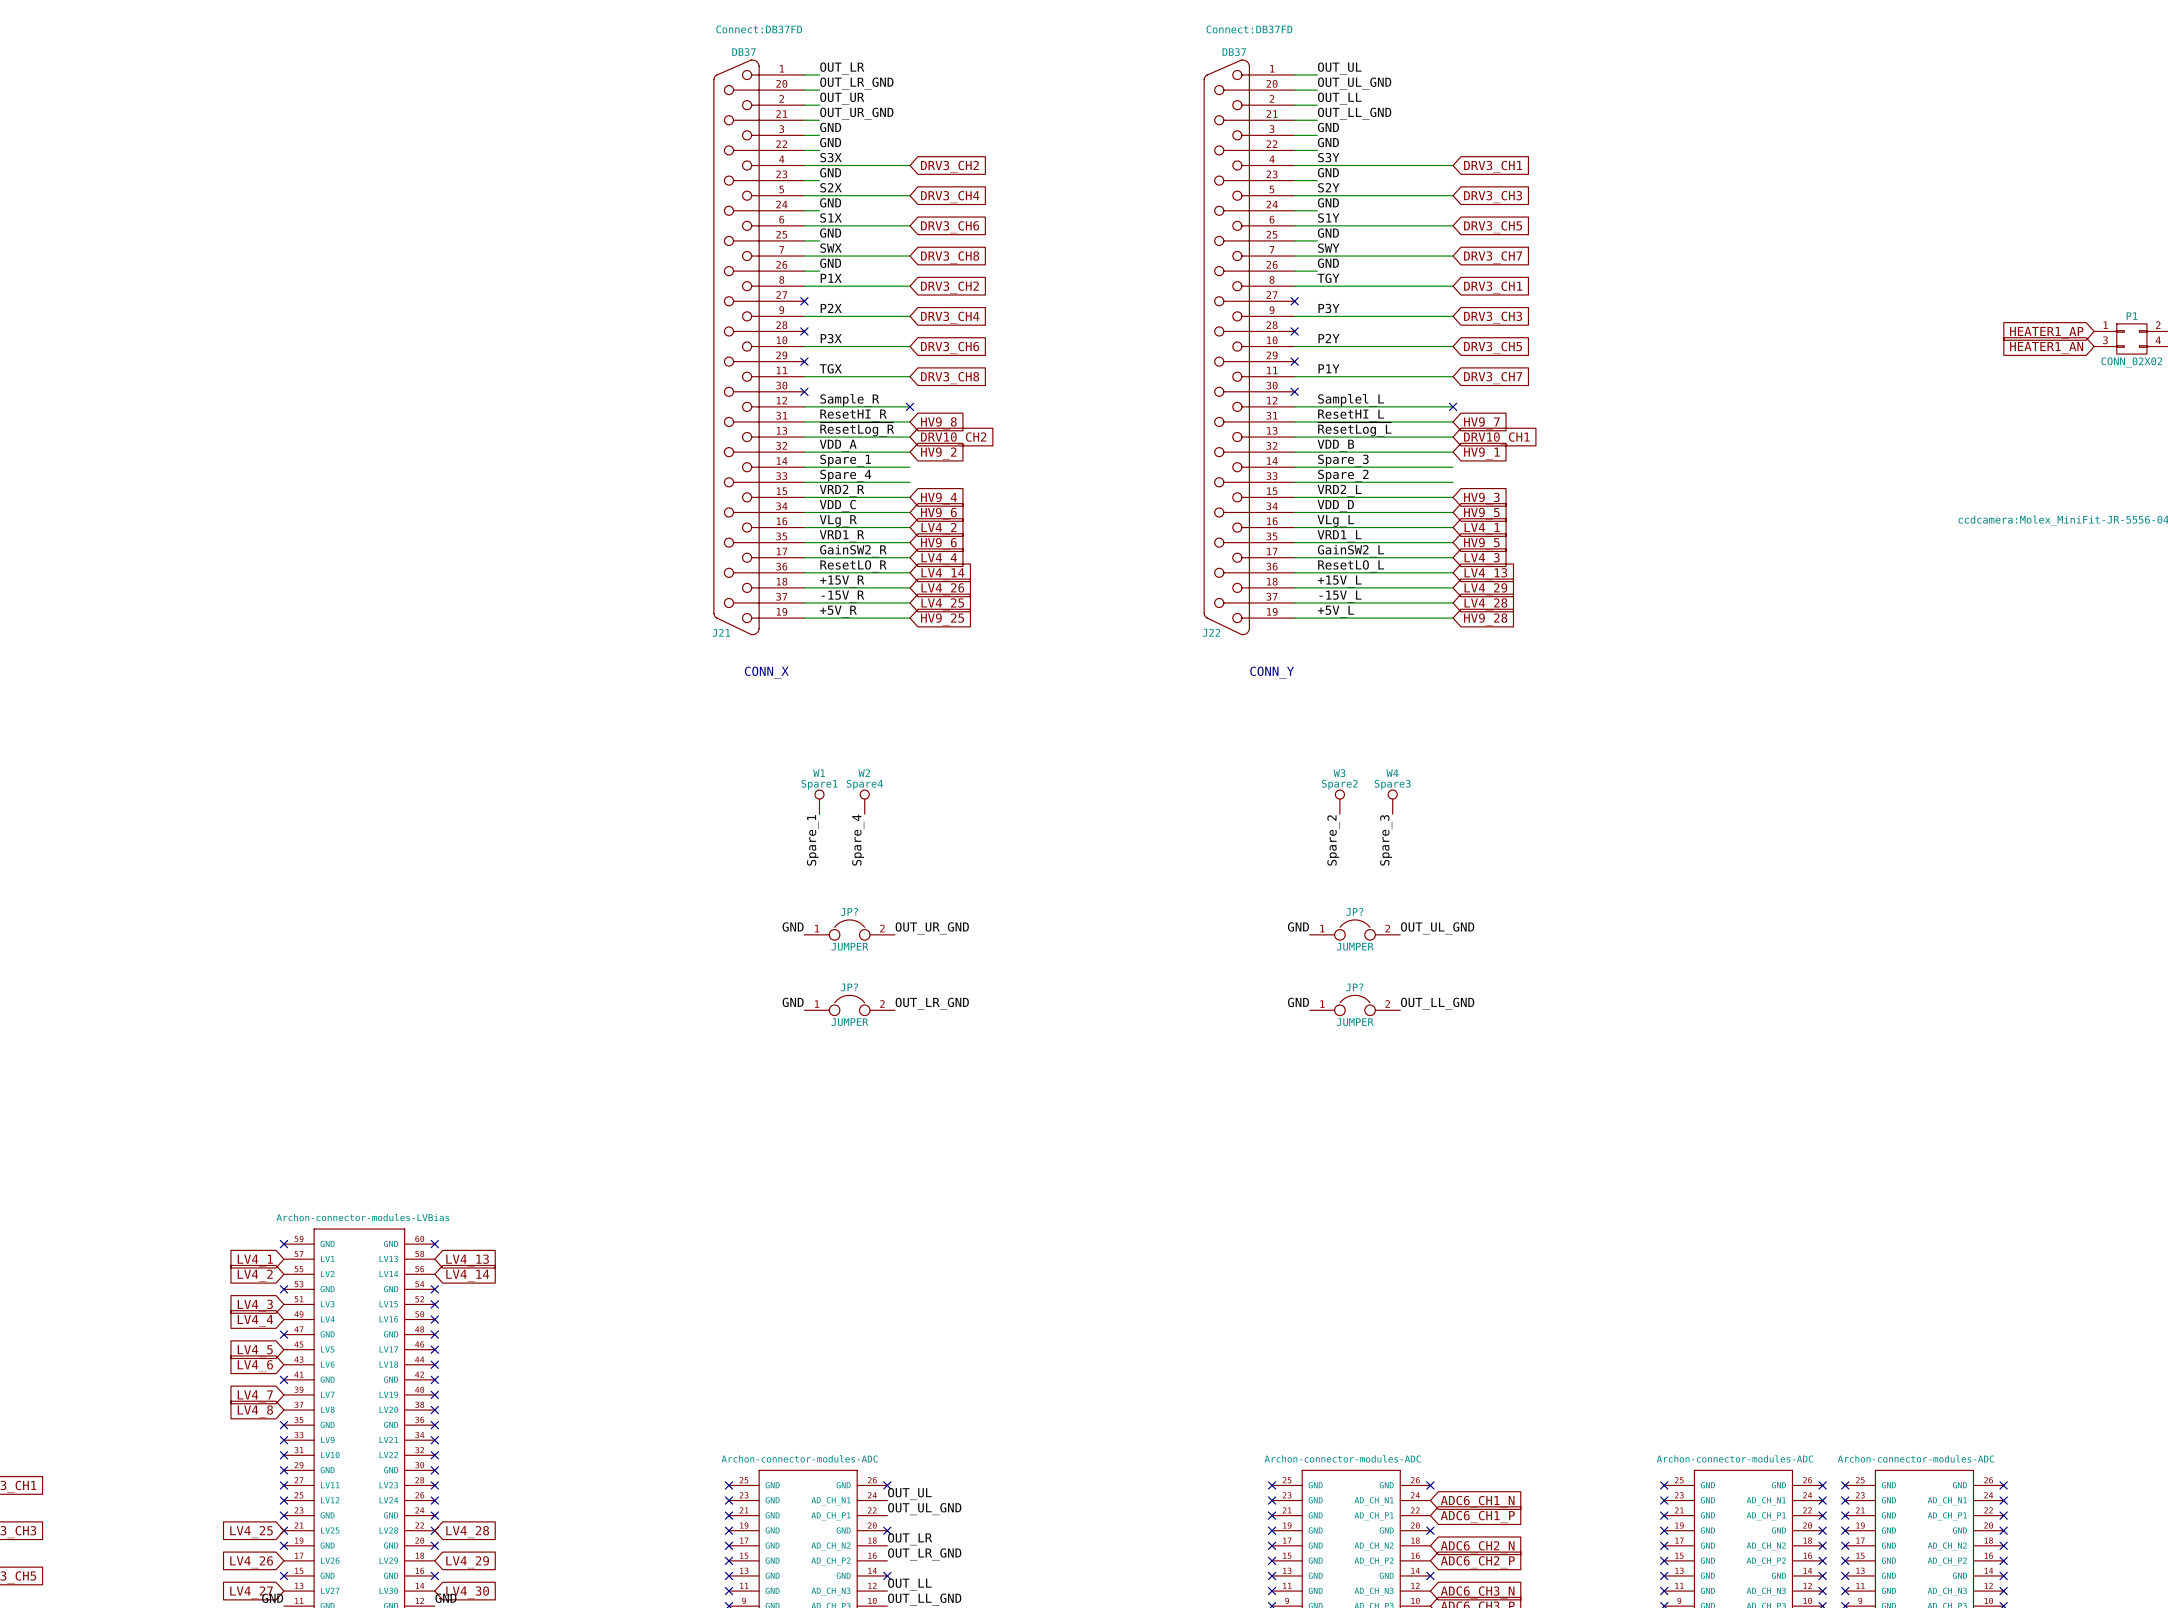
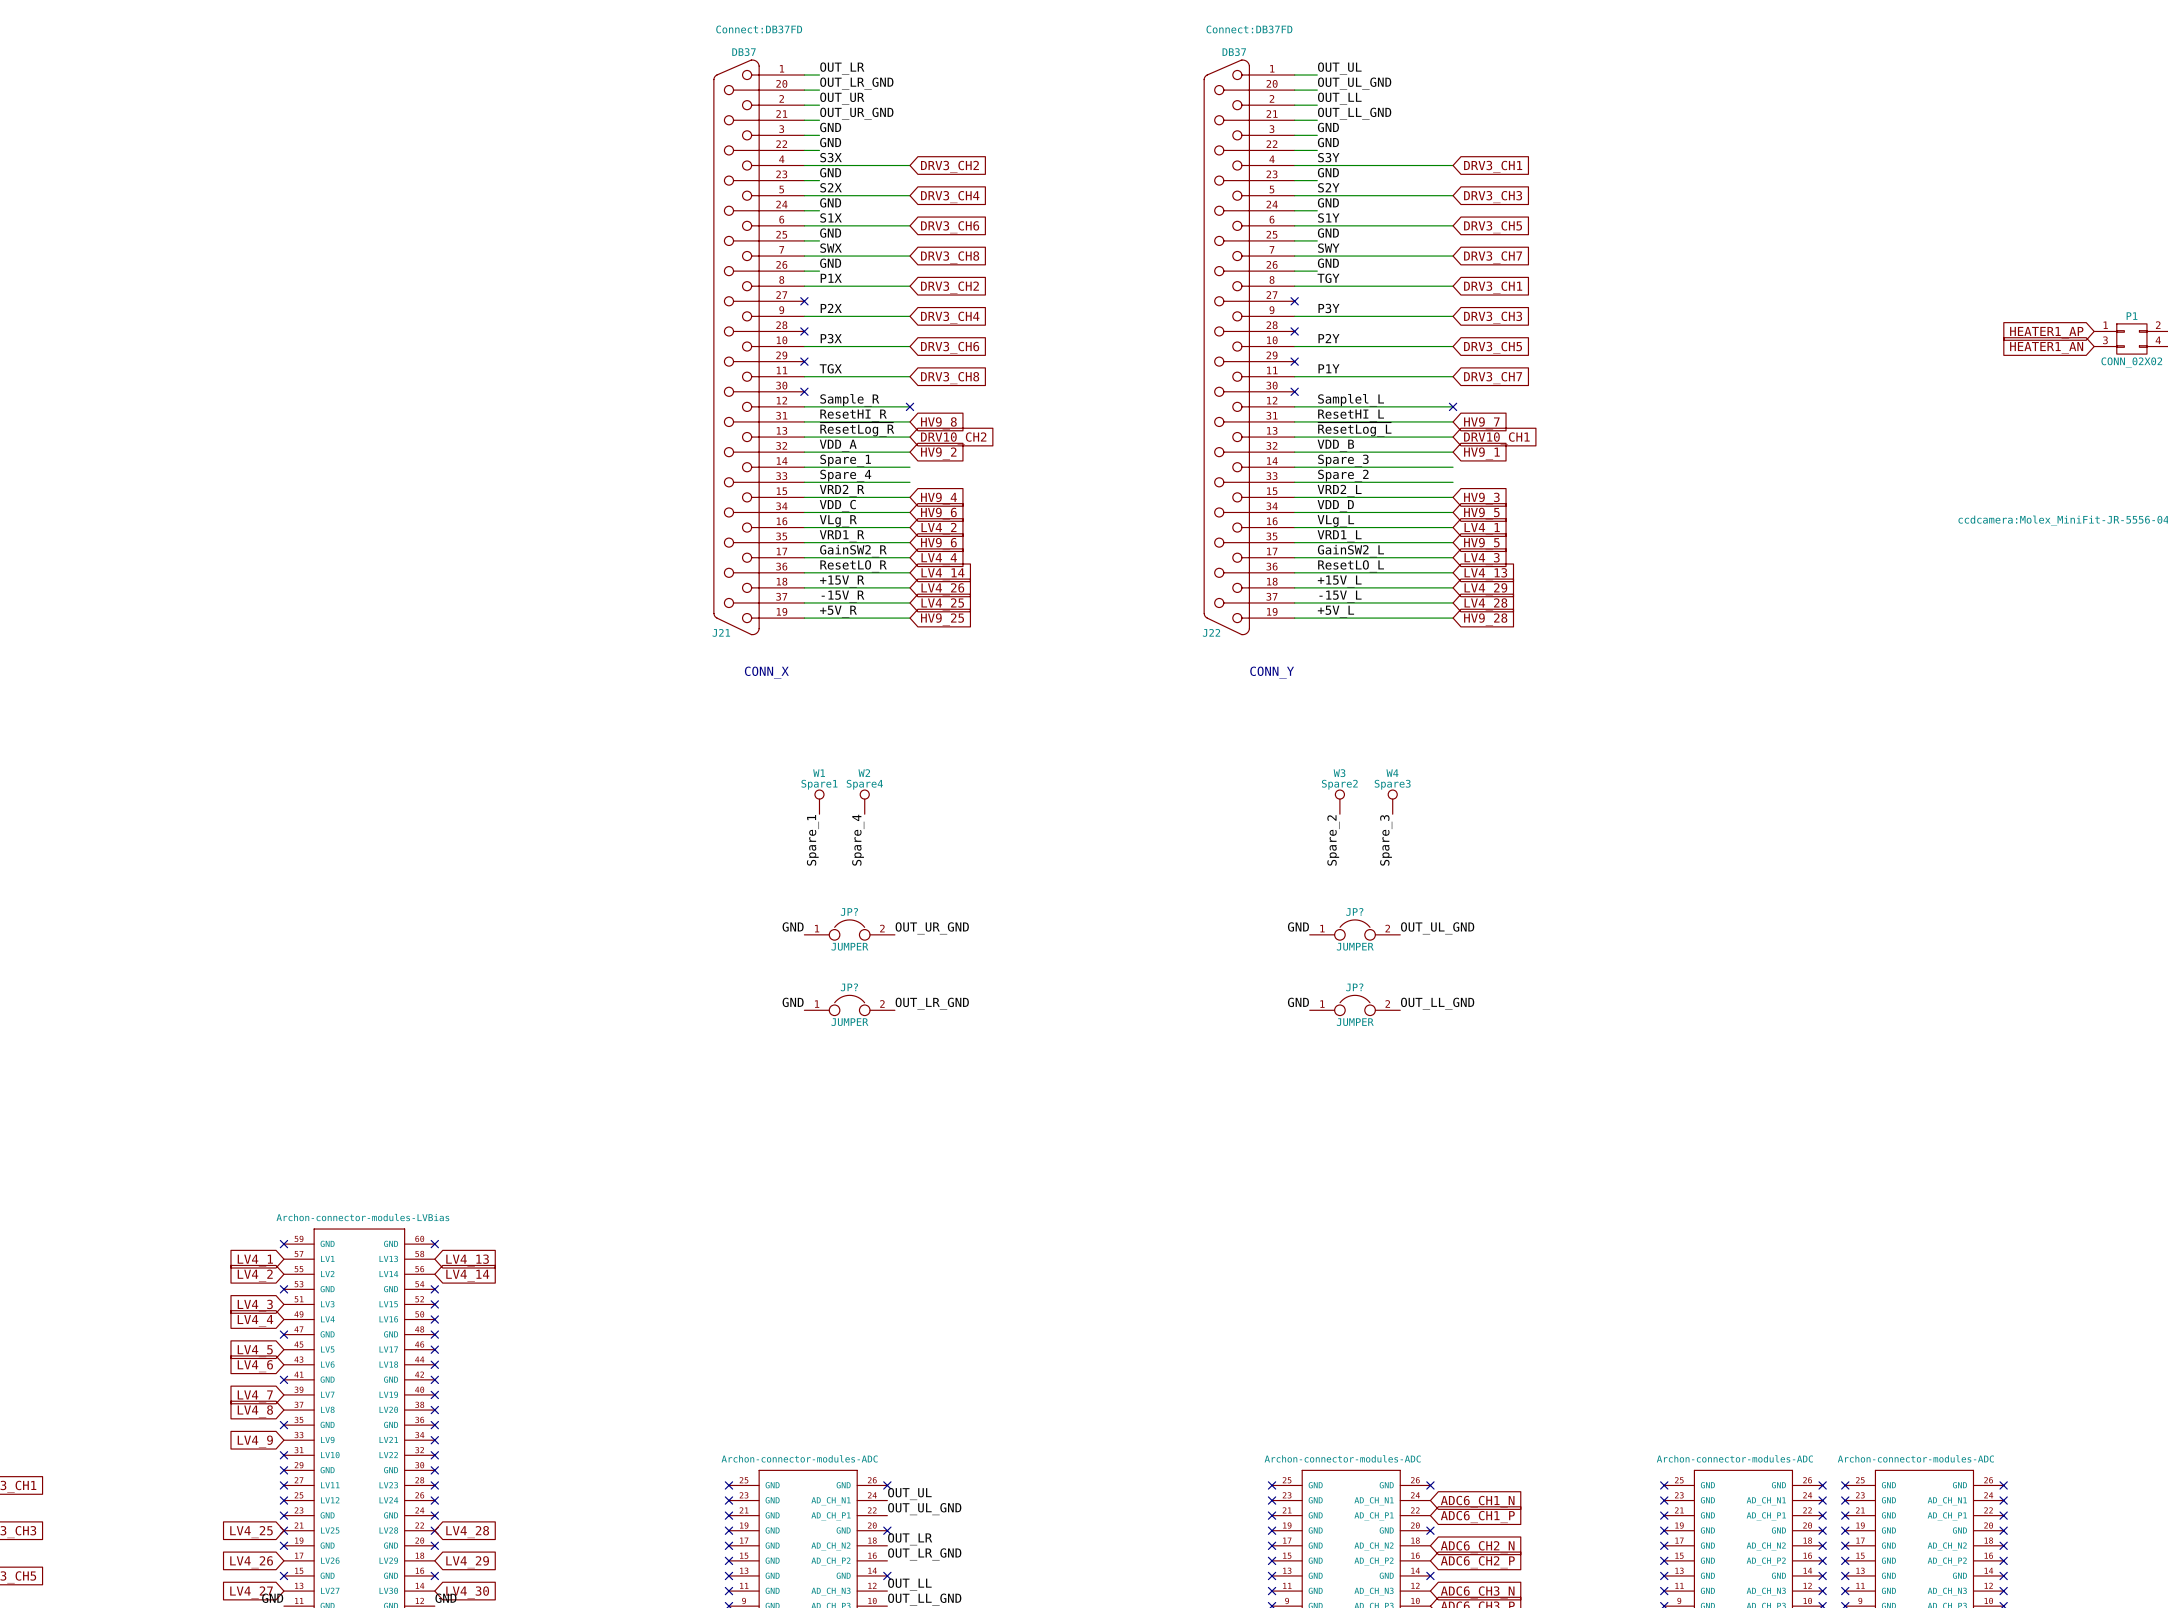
no-connect mark: (283, 1440) -> none
global label: none -> LV4_9 (255, 1441)

